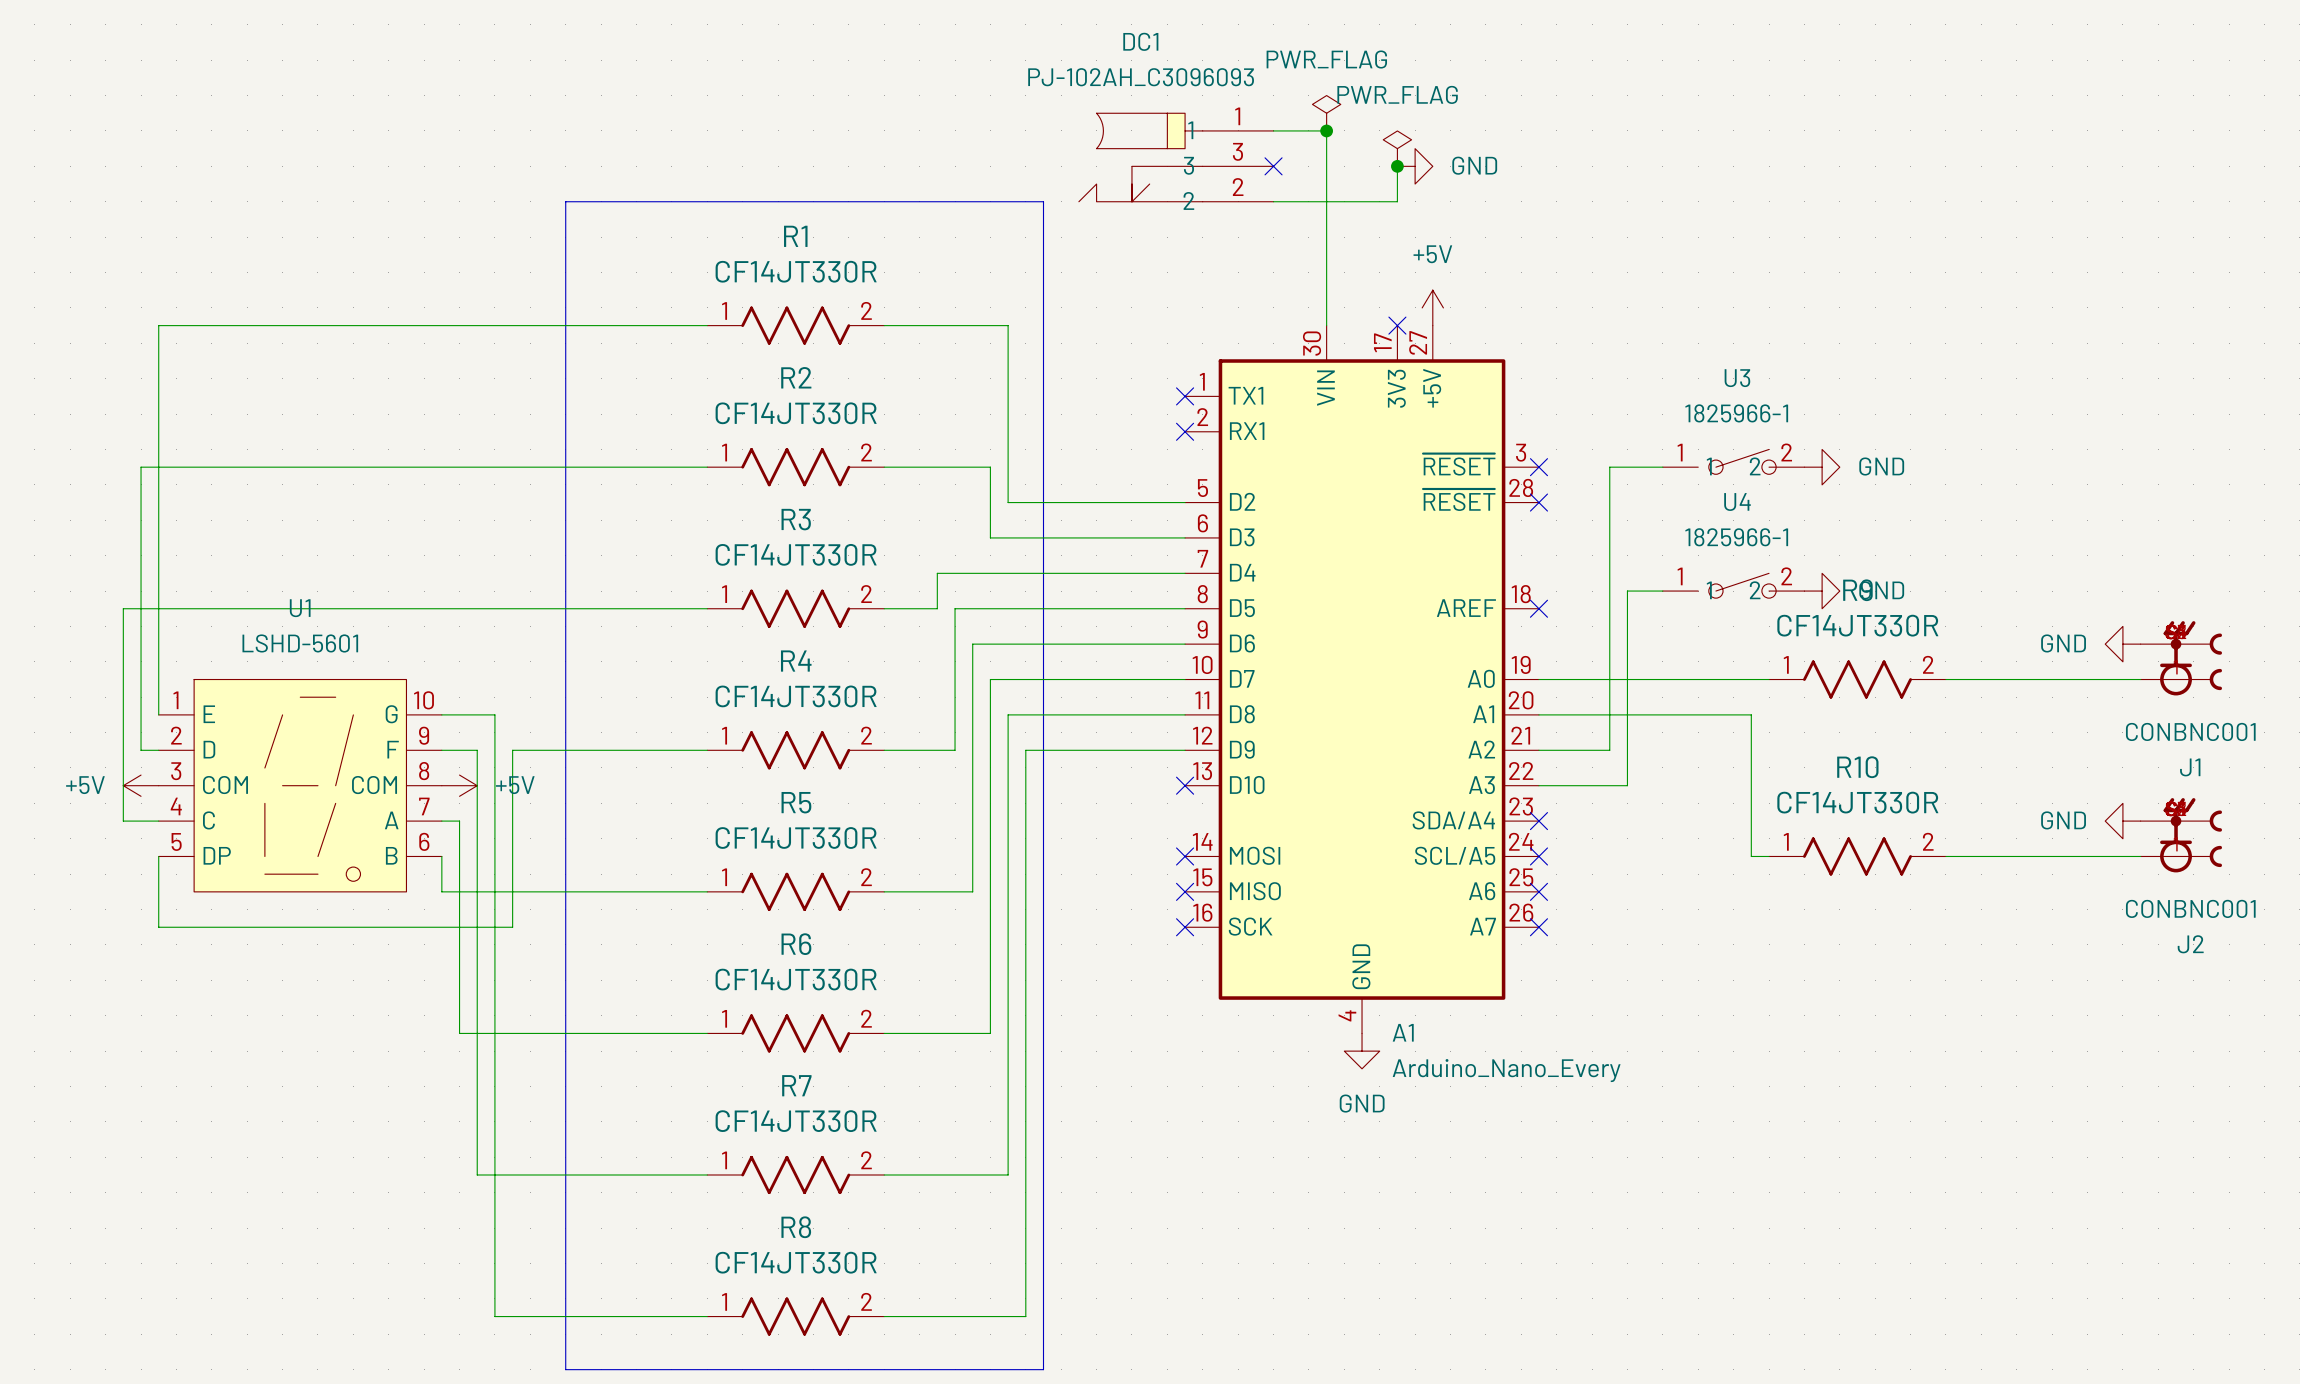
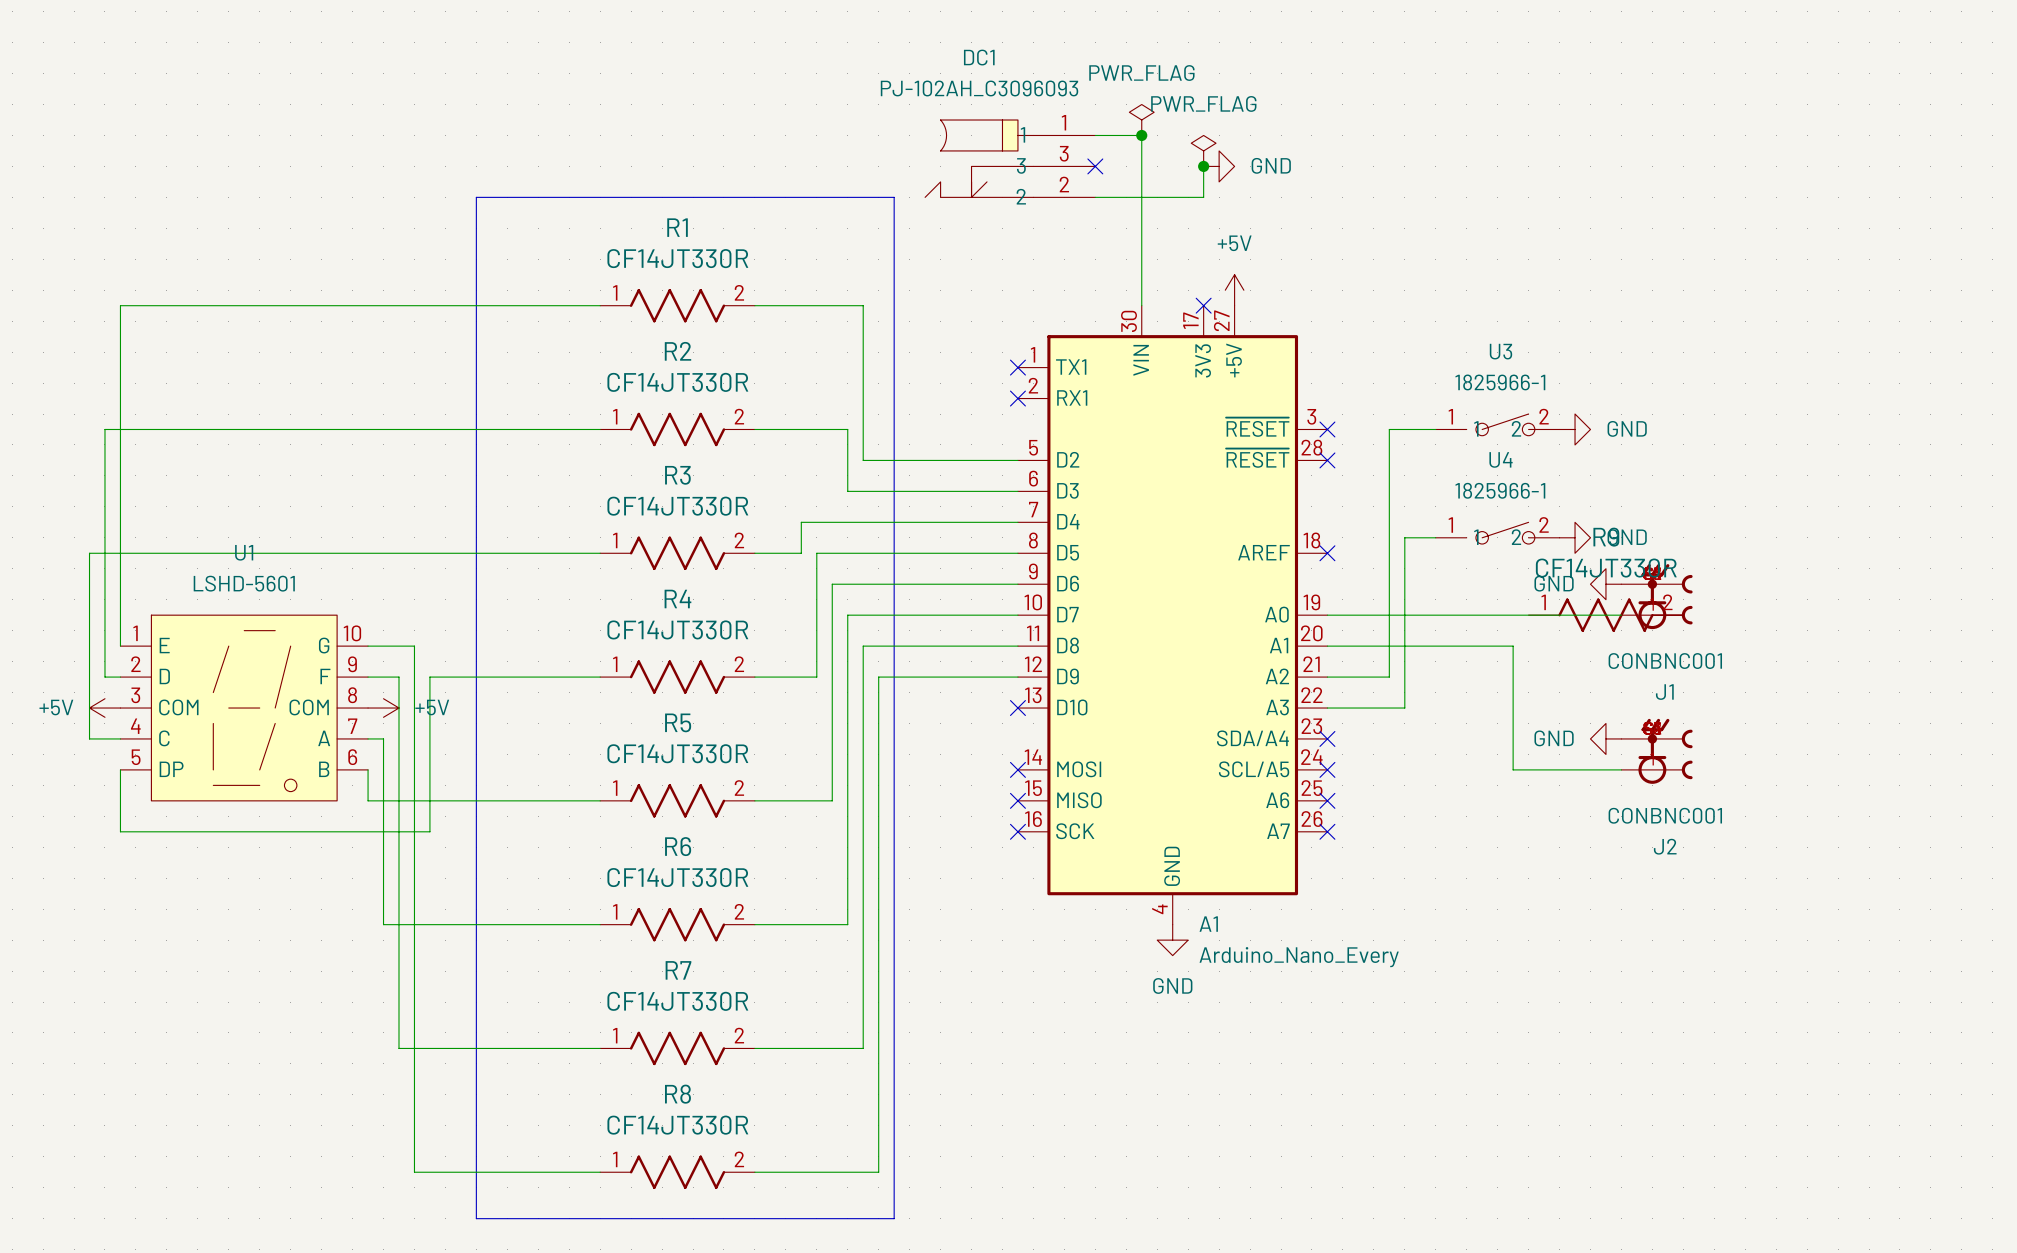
power symbol: none -> GND (1605, 584)
power symbol: GND (2122, 644) -> none
J1 position: (2181, 658) -> (1657, 596)
wire: none -> (1528, 615) (1621, 615)
wire: (1945, 679) (2140, 679) -> none
power symbol: none -> GND (1605, 738)
power symbol: GND (2122, 821) -> none
J2 position: (2181, 835) -> (1657, 751)
wire: none -> (1528, 769) (1621, 769)
R10: CF14JT330R (1857, 856) -> none
wire: (1945, 856) (2140, 856) -> none

